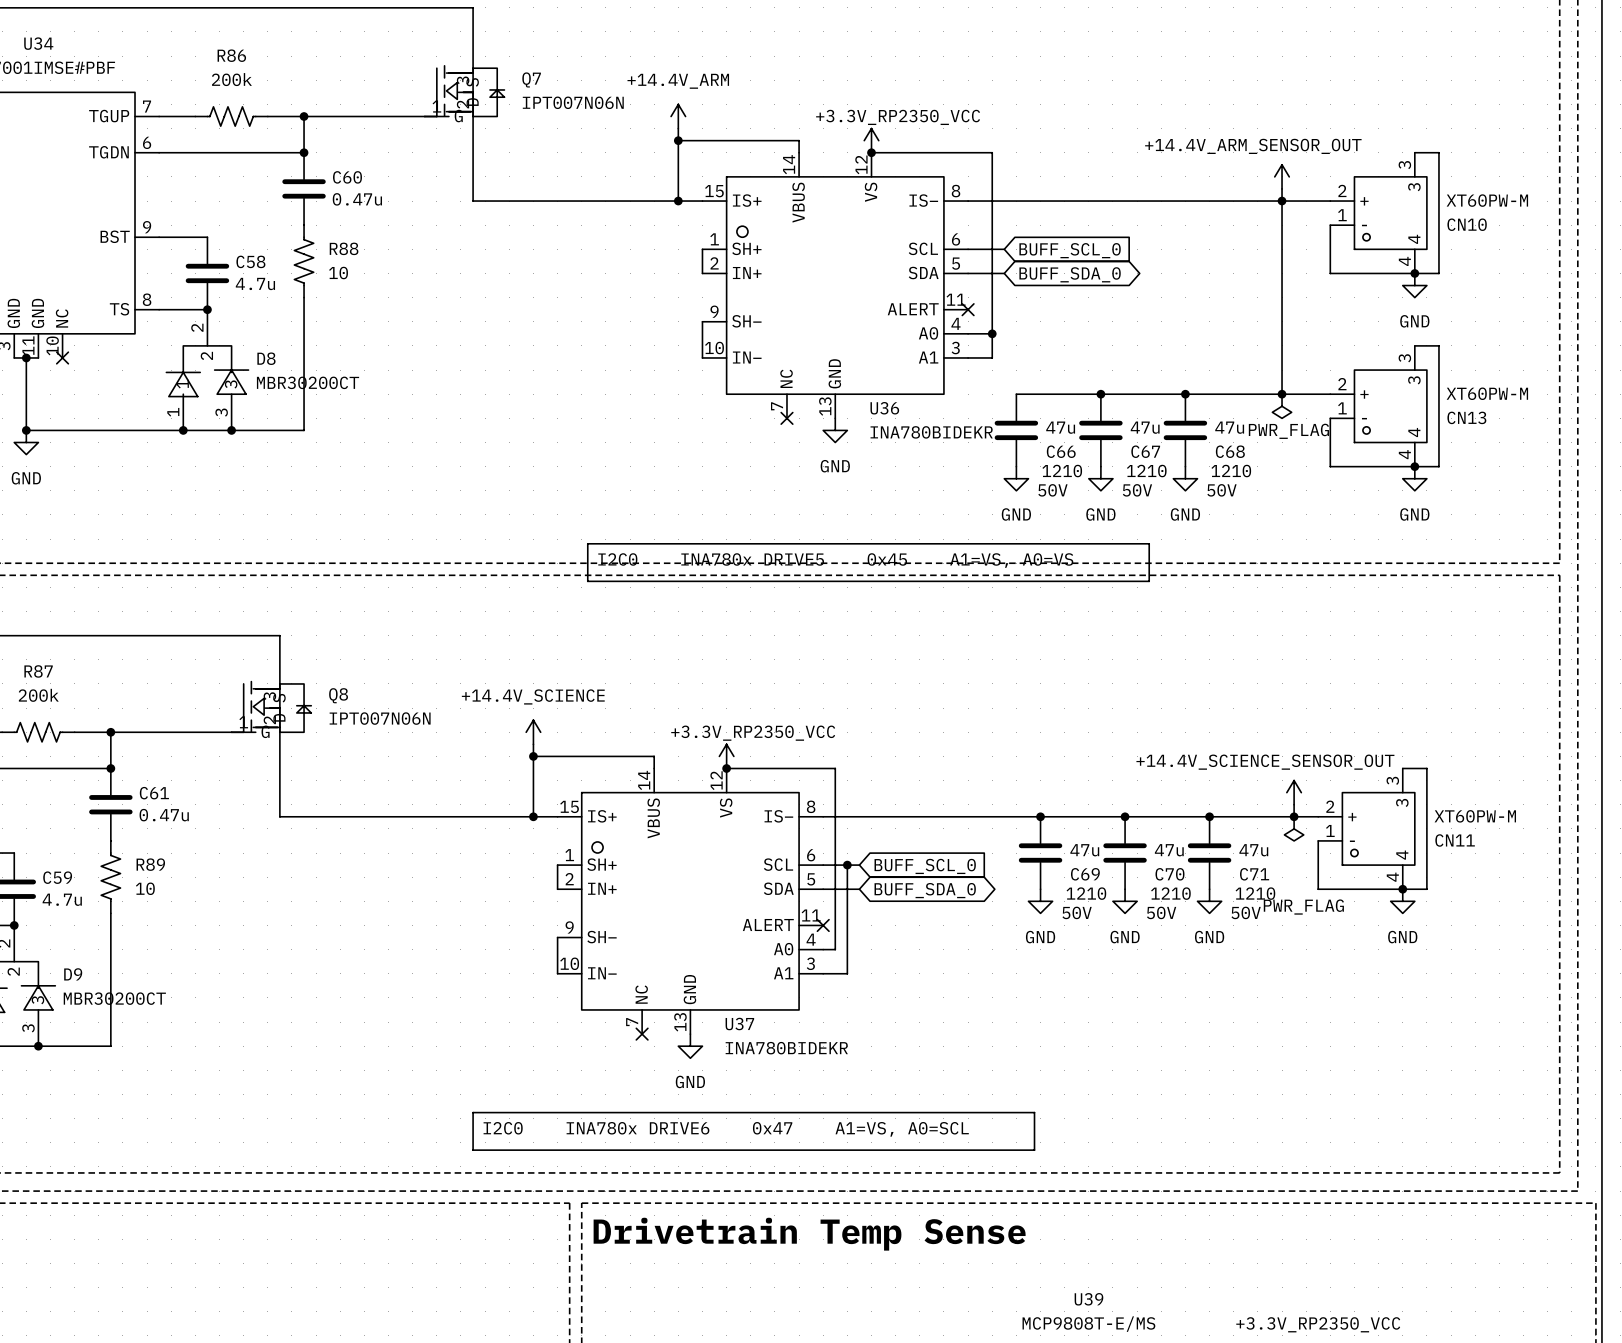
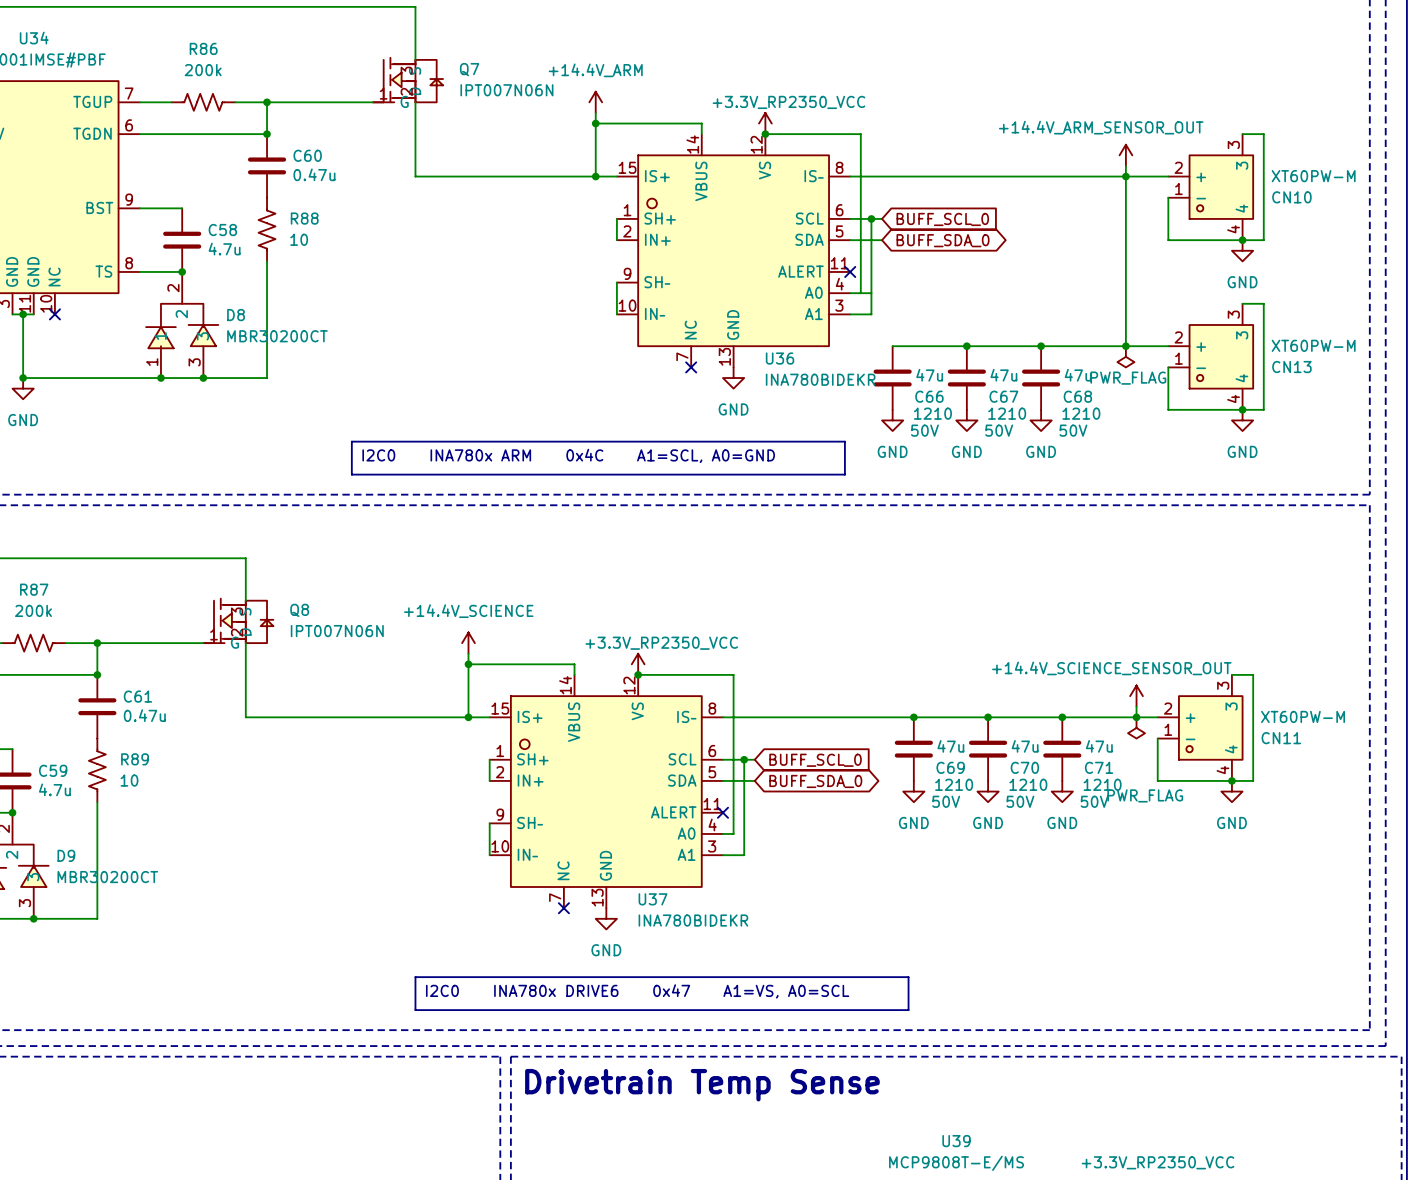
wire: (980, 152) (992, 152) (992, 249) -> (860, 134) (860, 293)
junction: none -> (871, 218)
junction: (992, 333) -> none
text: none -> I2C0 INA780x ARM 0x4C A1=SCL, A0=GND (568, 455)
line: (587, 543) (1149, 543) (1149, 581) (587, 581) (587, 543) -> (351, 441) (844, 441) (844, 474) (351, 474) (351, 441)
text: I2C0 INA780x DRIVE5 0x45 A1=VS, A0=VS (835, 560) -> none

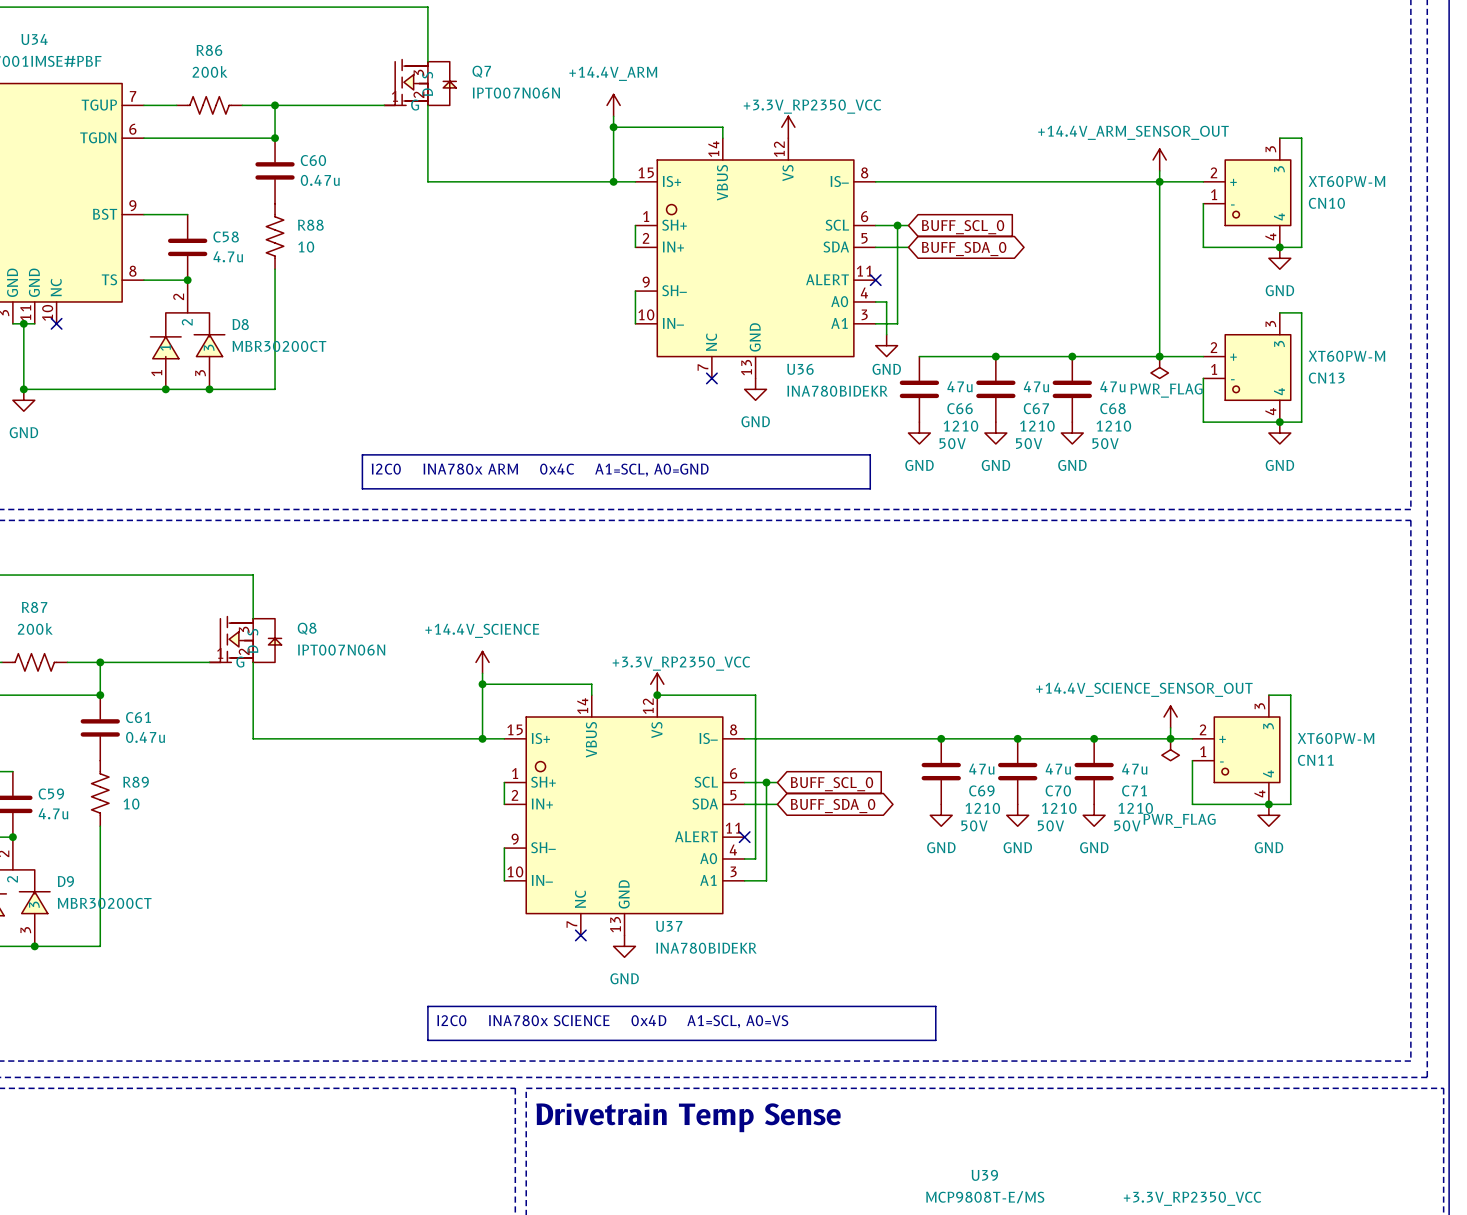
wire: (765, 134) (860, 134) (860, 293) (871, 293) -> none
junction: (765, 134) -> none
wire: none -> (886, 301) (886, 334)
power symbol: none -> GND (886, 345)
text: I2C0 INA780x DRIVE6 0x47 A1=VS, A0=SCL (637, 991) -> I2C0 INA780x SCIENCE 0x4D A1=SCL, A0=VS (612, 1021)

